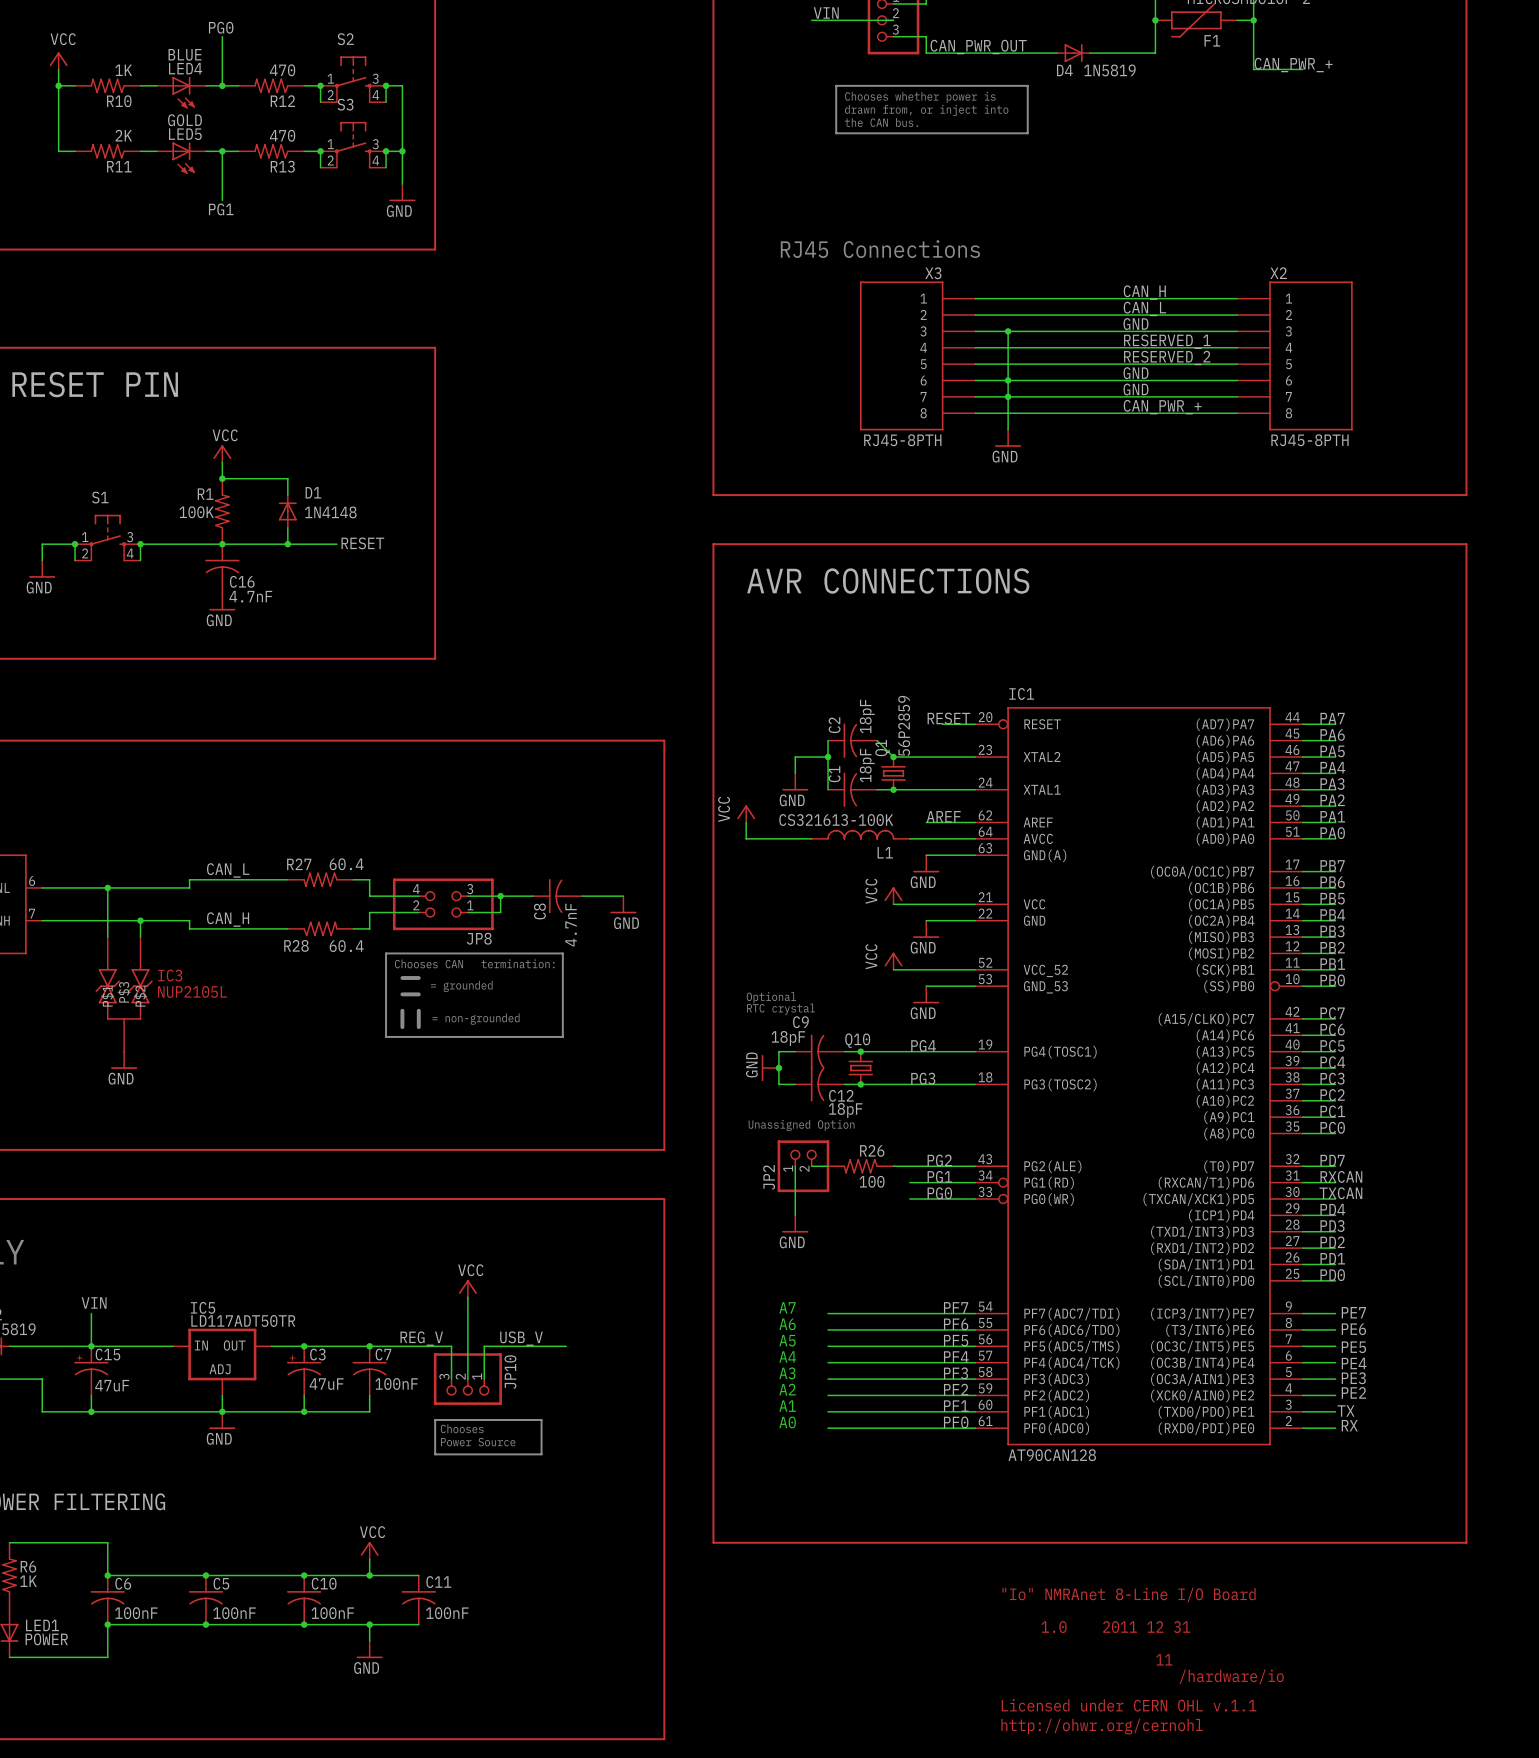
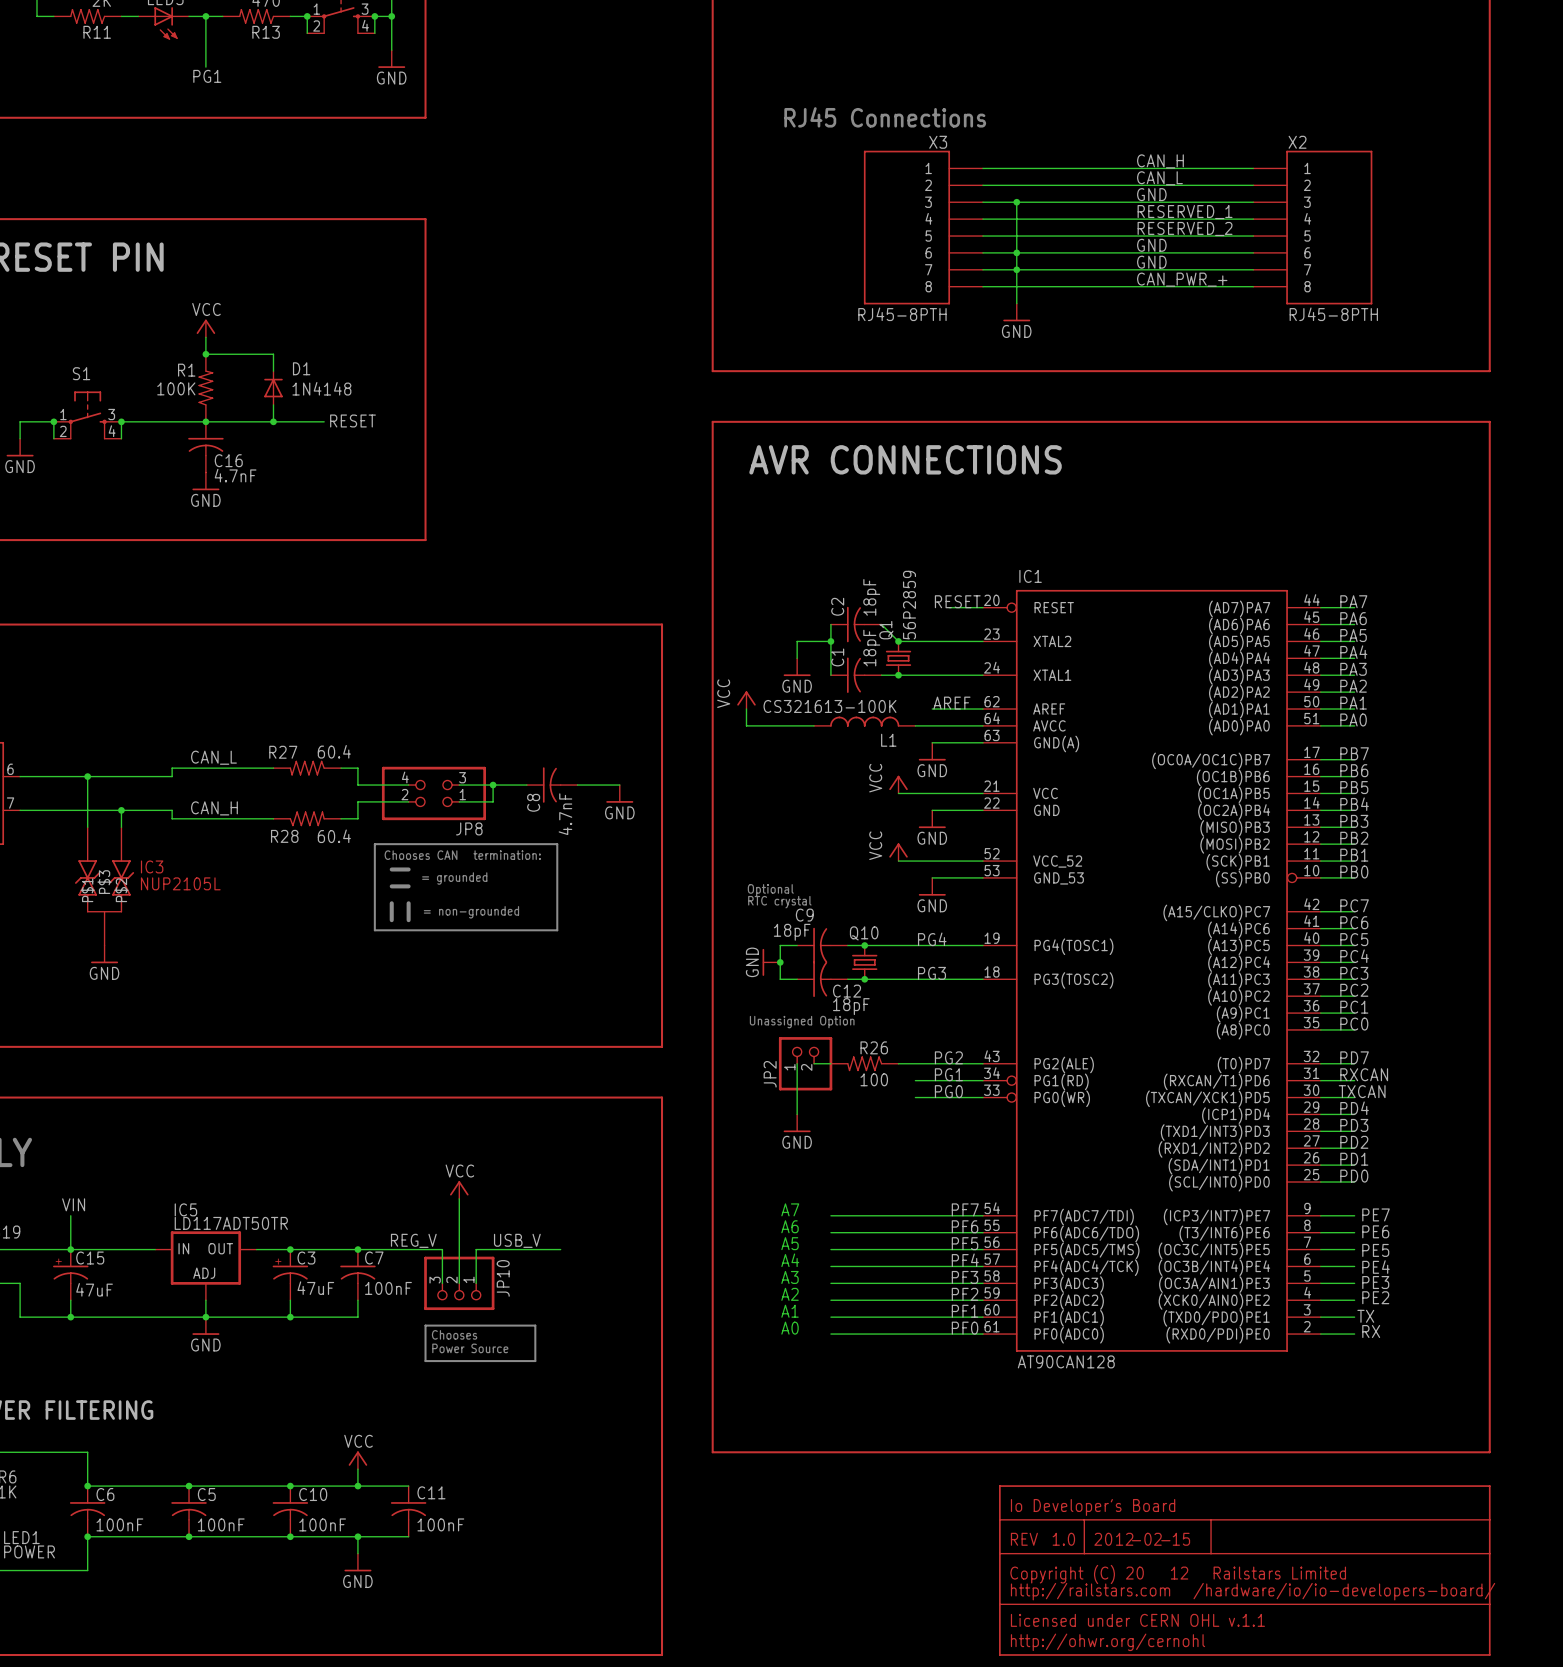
text: "Io" NMRAnet 8-Line I/O Board (1129, 1594) -> Io Developer's Board (1093, 1507)
text: 2011 12 31 (1146, 1627) -> 12 02 15 (1153, 1539)
part: none -> (1244, 1570)
text: 11 (1164, 1659) -> 12 (1179, 1573)
text: /hardware/io (1231, 1676) -> /hardware/io/io-developers-board/ (1344, 1591)

